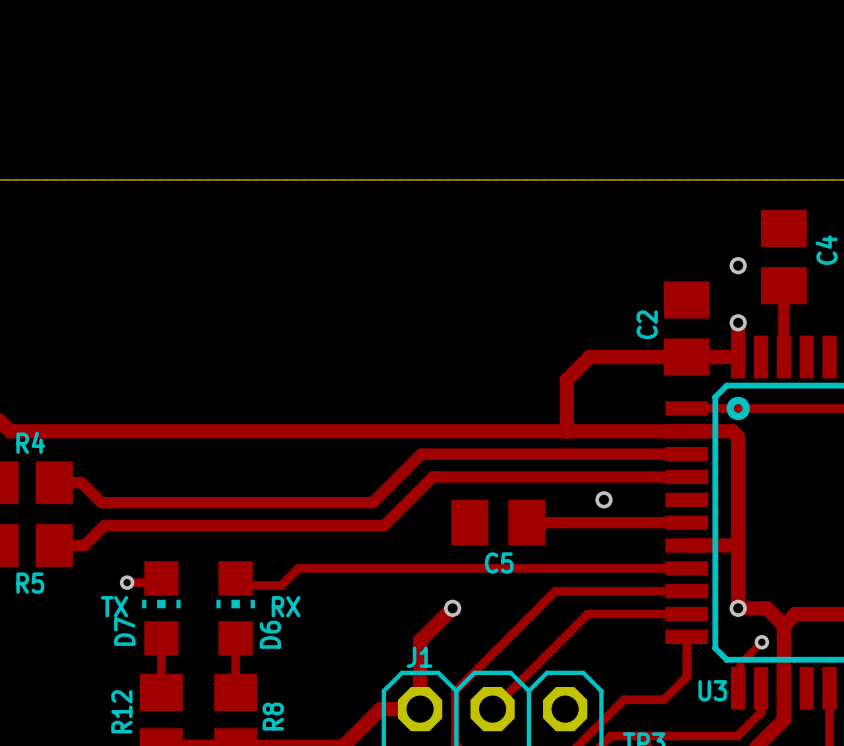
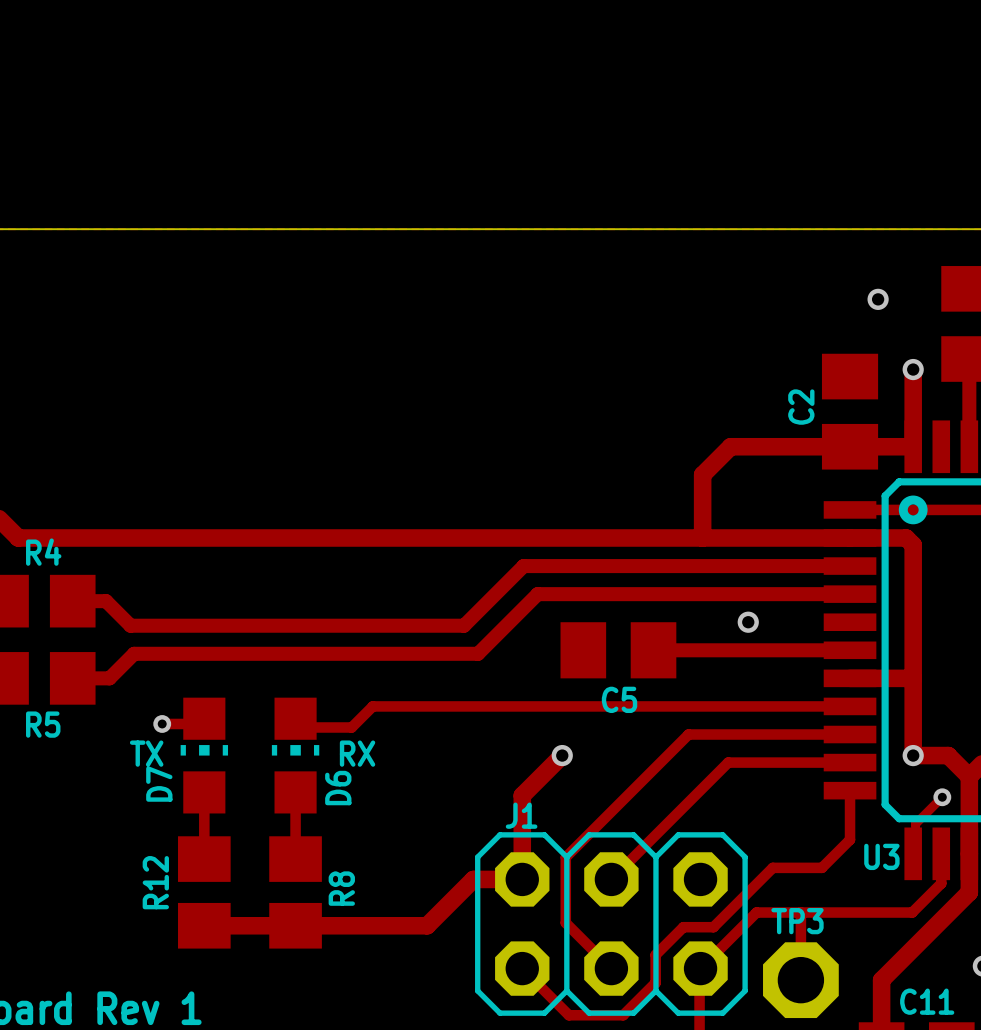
via: none -> (878, 299)
via: (738, 265) -> none
track: none -> (913, 369) (913, 404)
via: none -> (913, 369)
via: (738, 322) -> none

